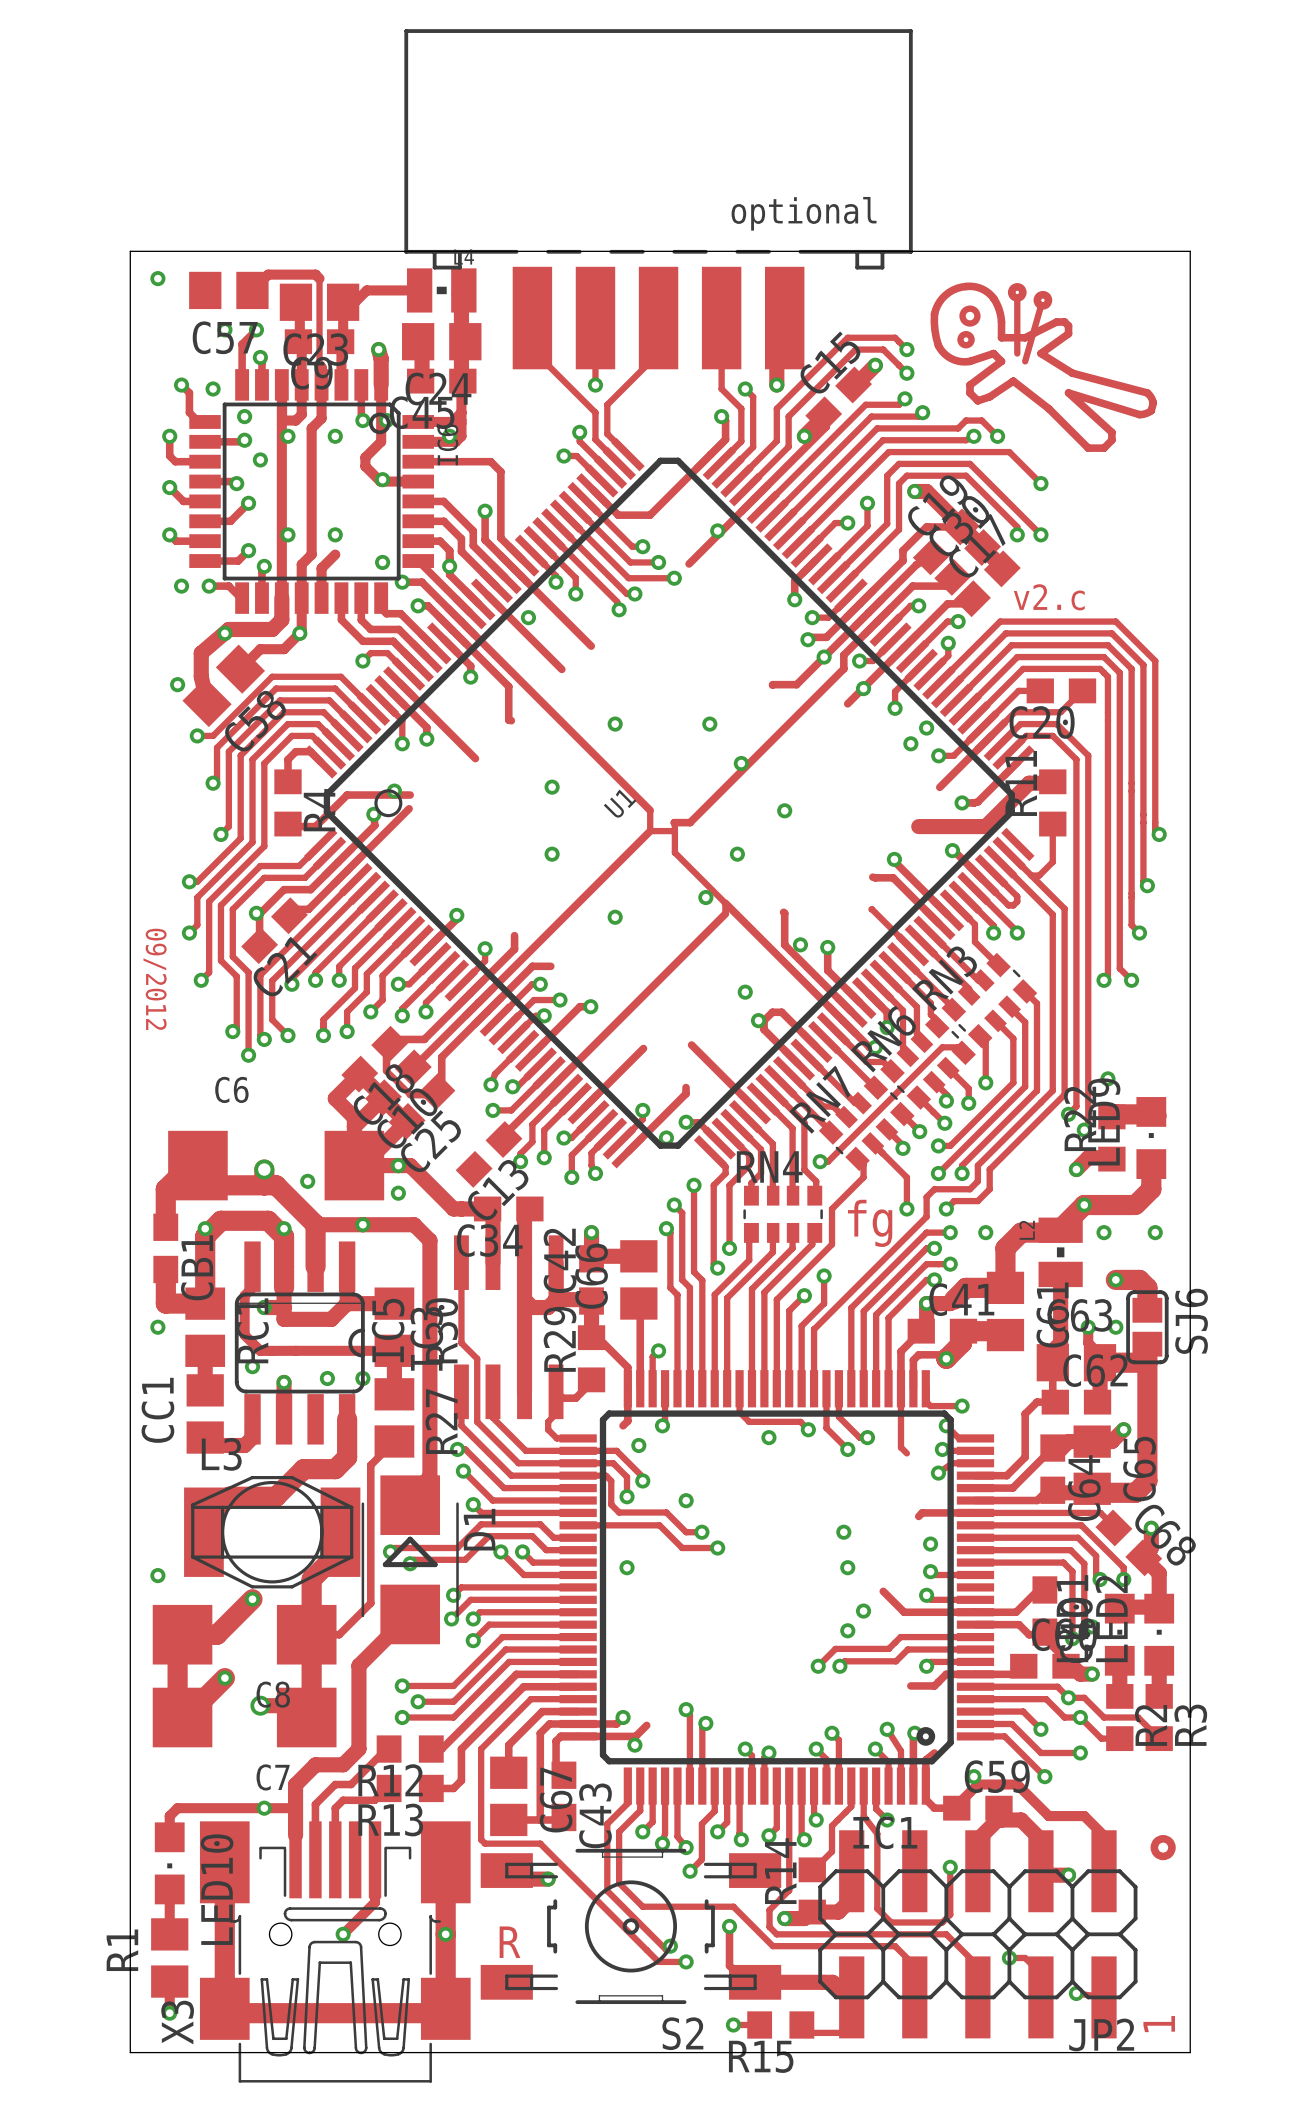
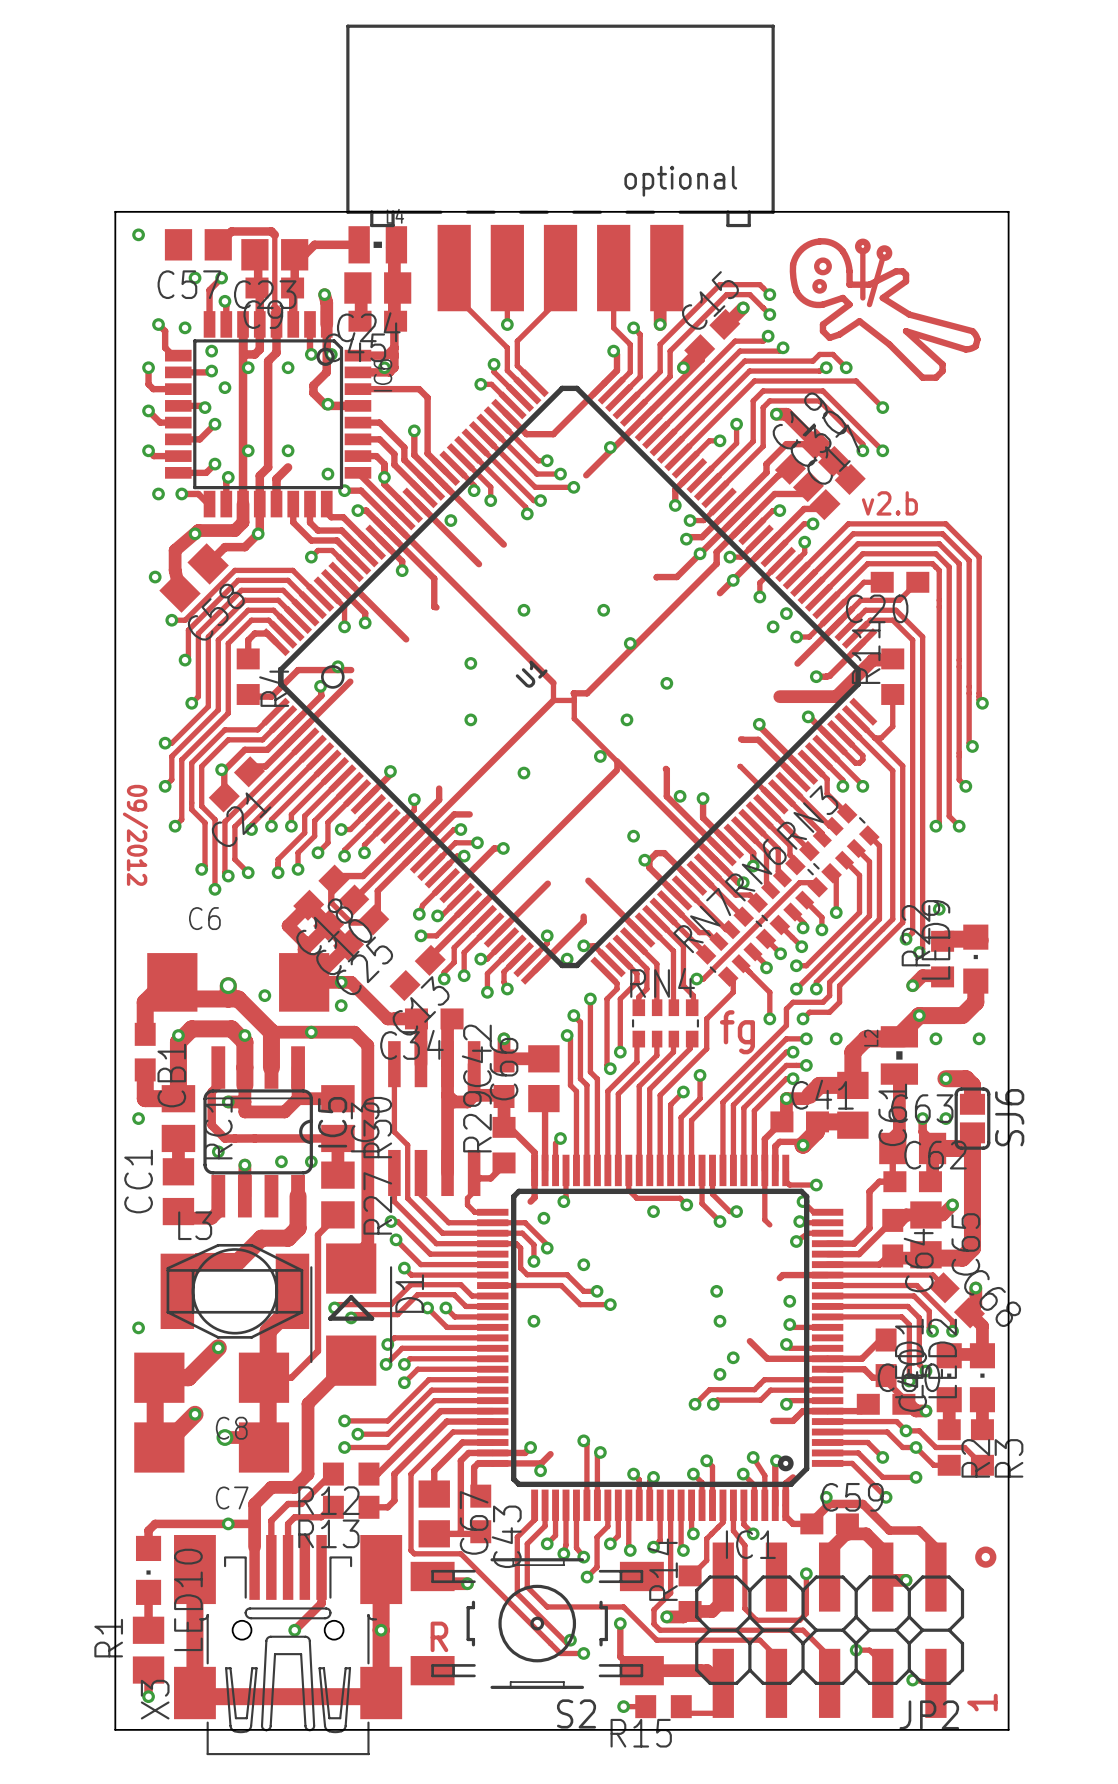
text: v2.c (1049, 597) -> v2.b (889, 503)

